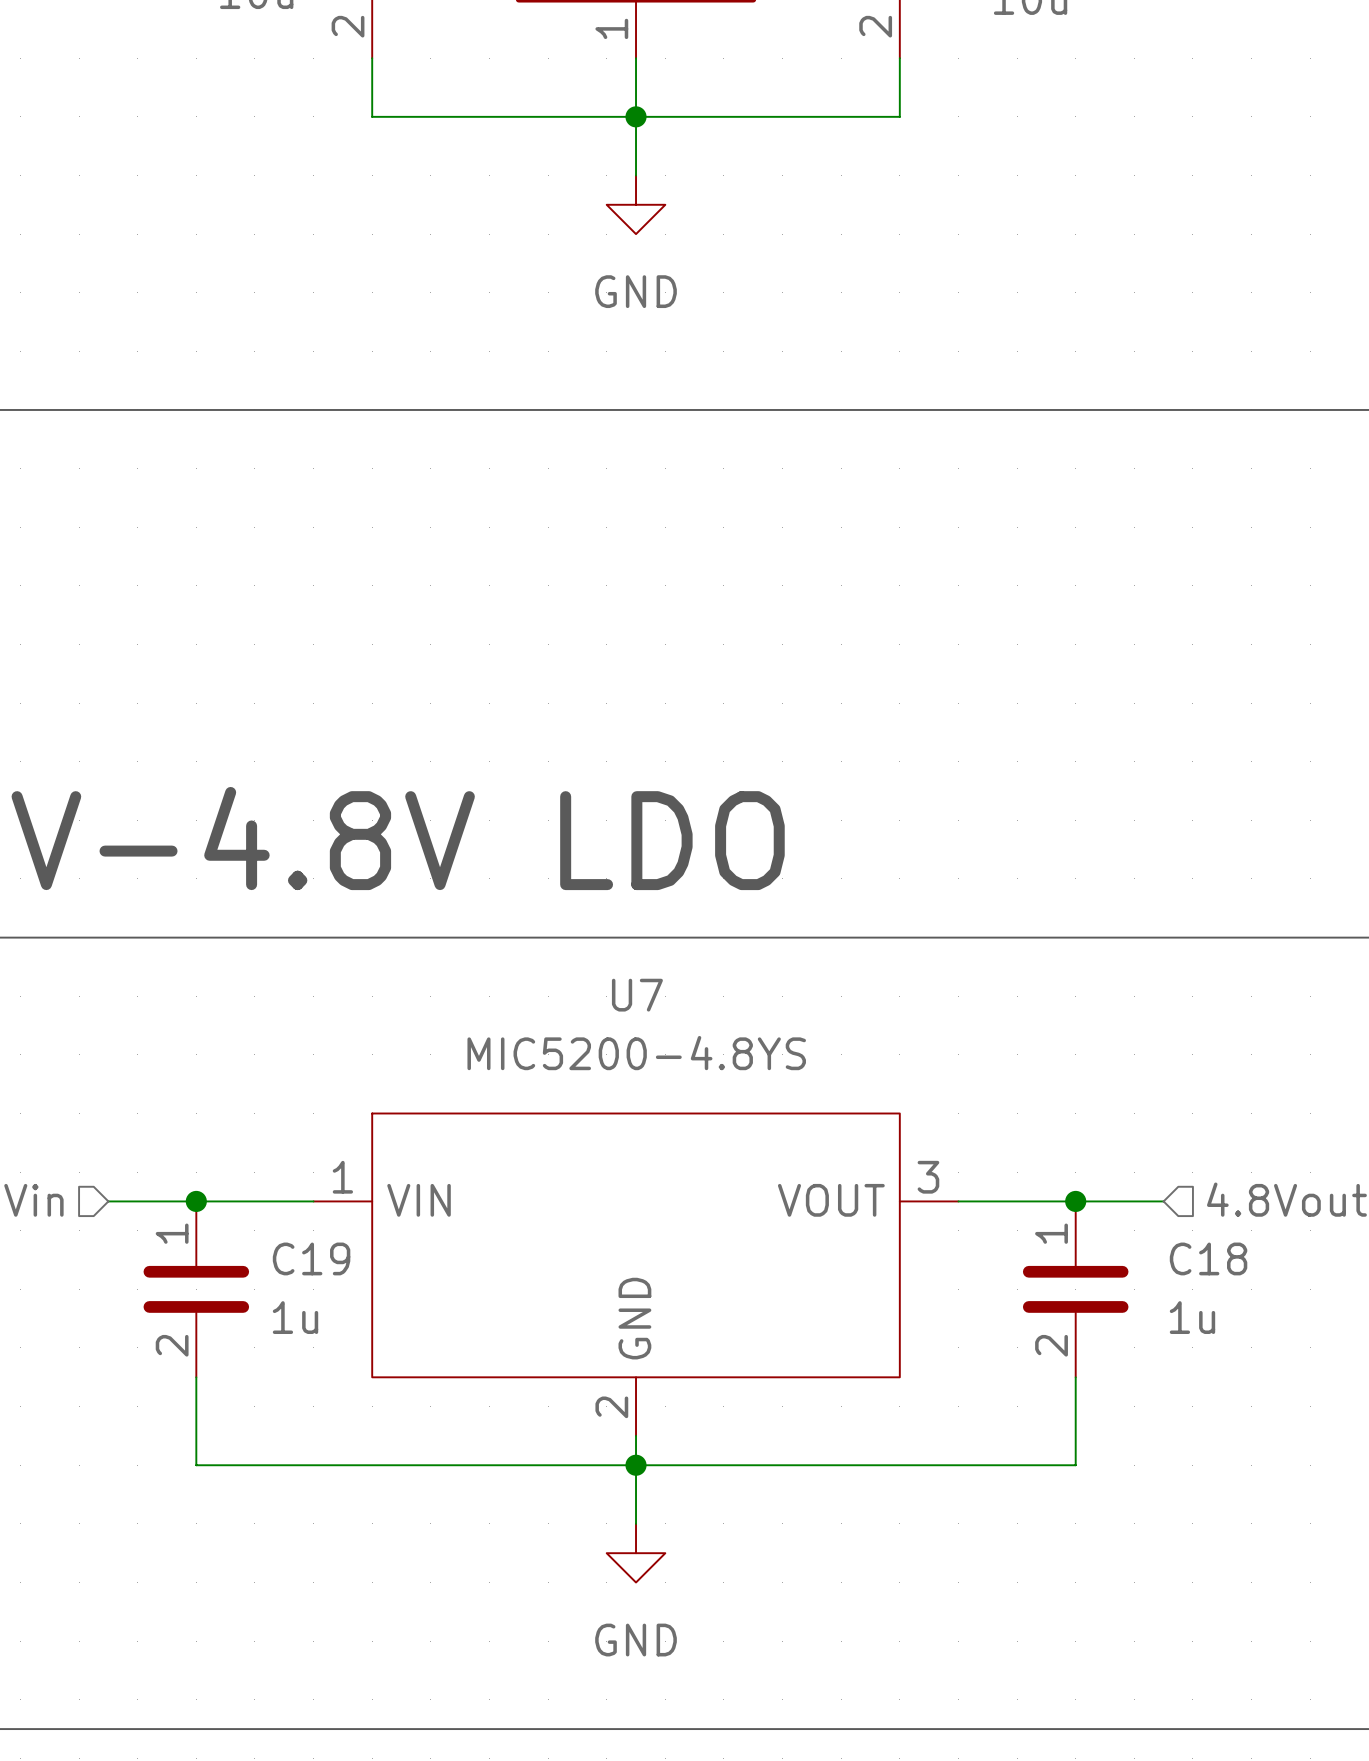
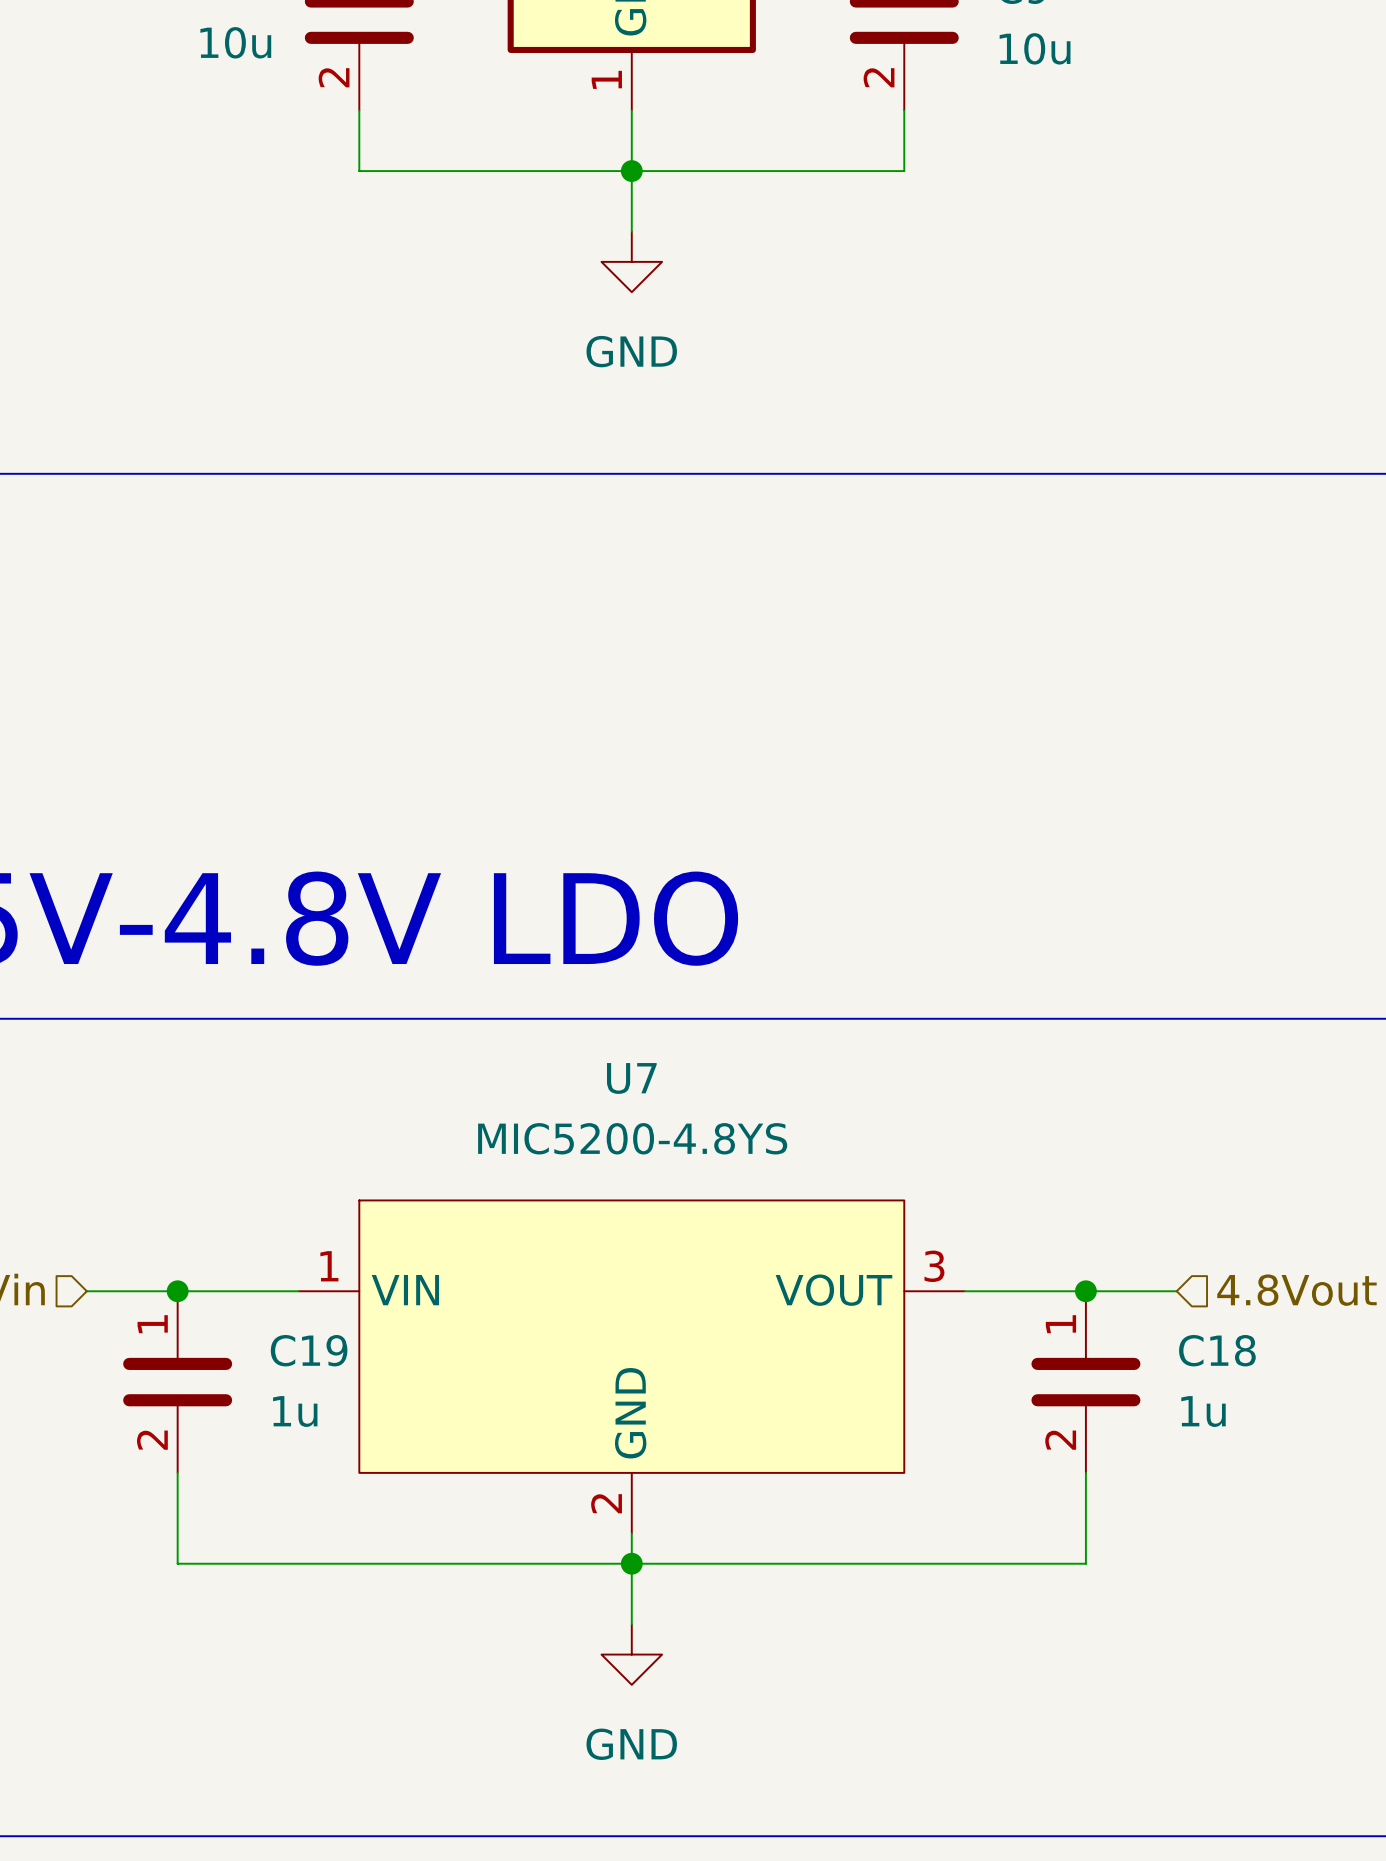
C19 name position: C19 (311, 1258) -> C19 (309, 1350)
C19 value position: 1u (295, 1317) -> 1u (295, 1411)

